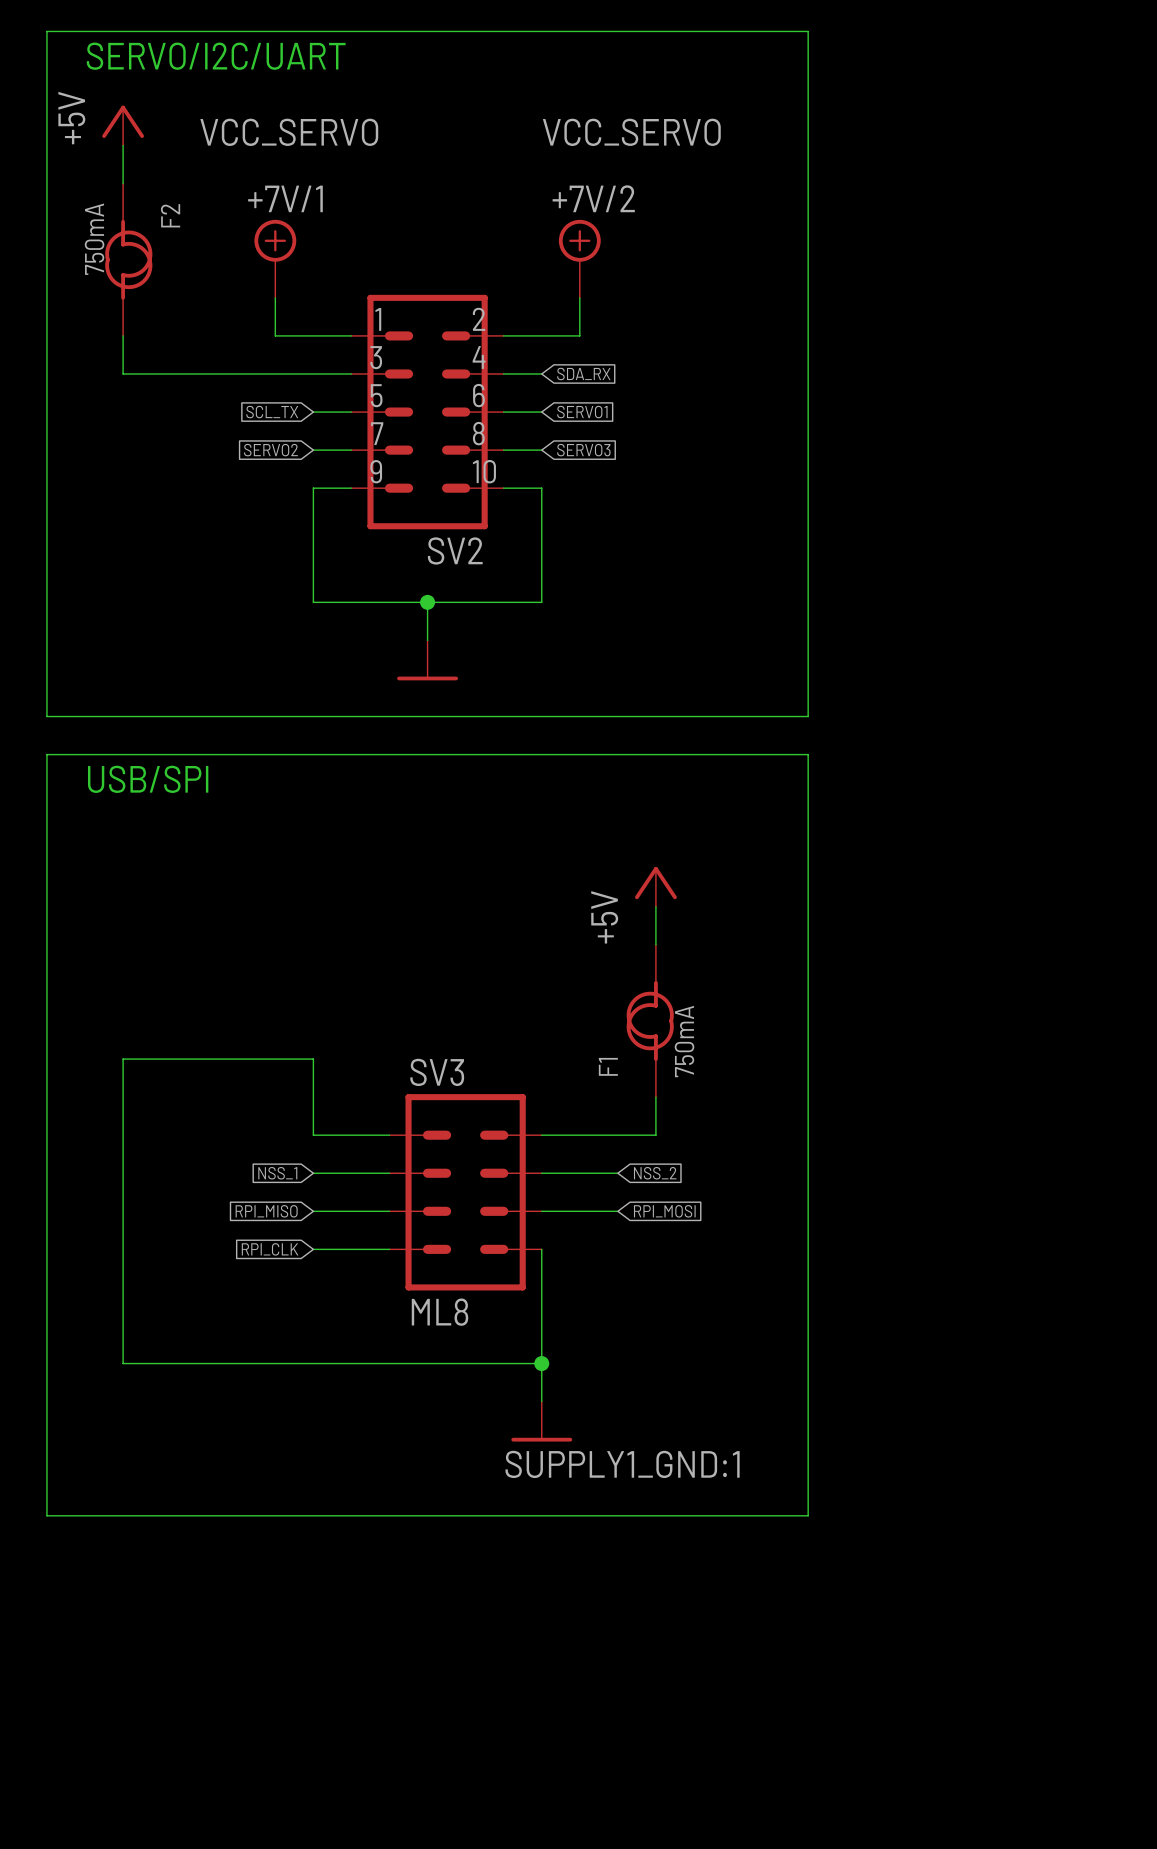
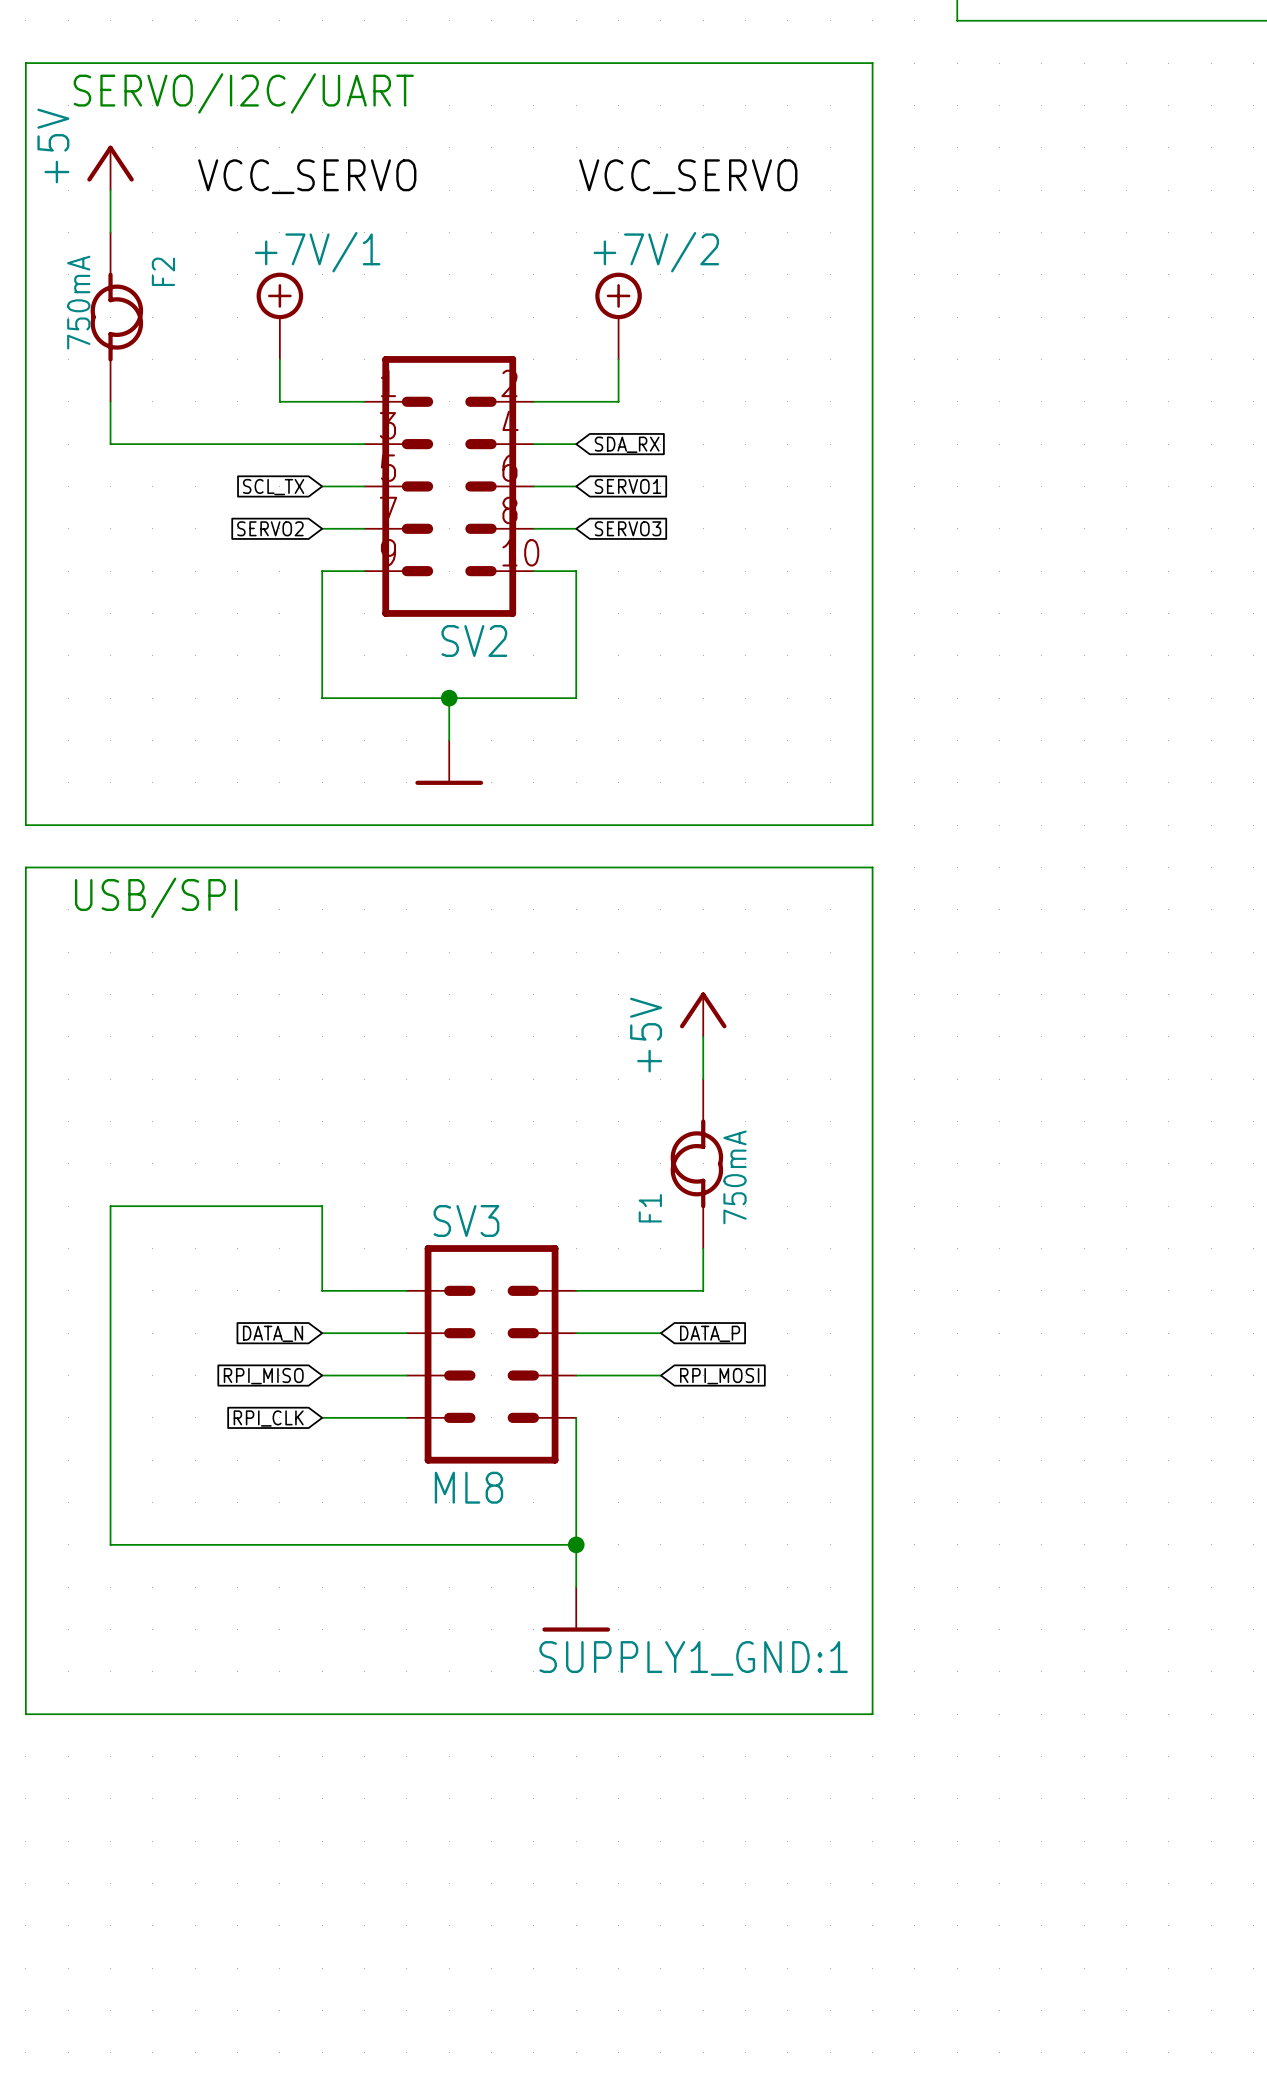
global label: NSS_1 (277, 1173) -> DATA_N (273, 1333)
global label: NSS_2 (655, 1173) -> DATA_P (710, 1333)

